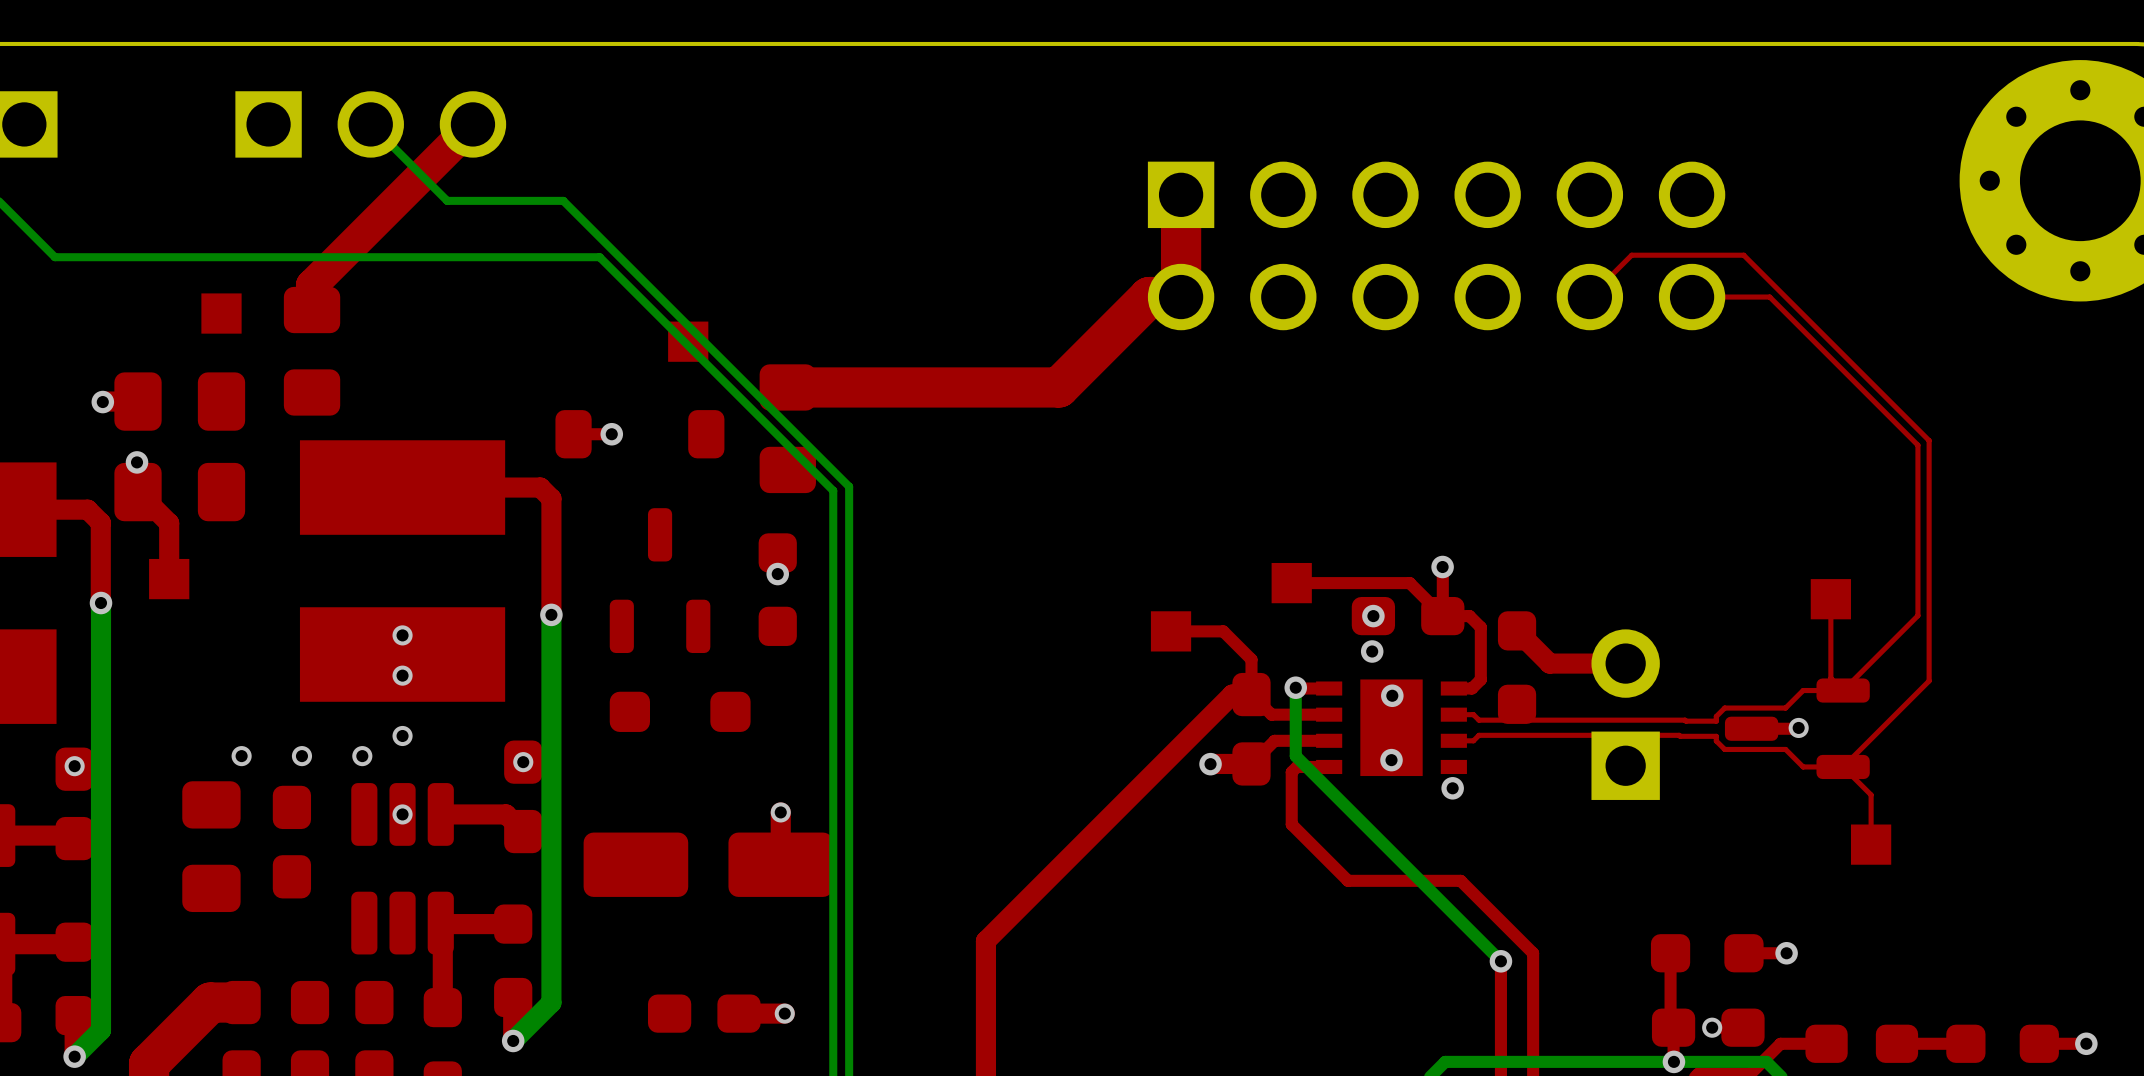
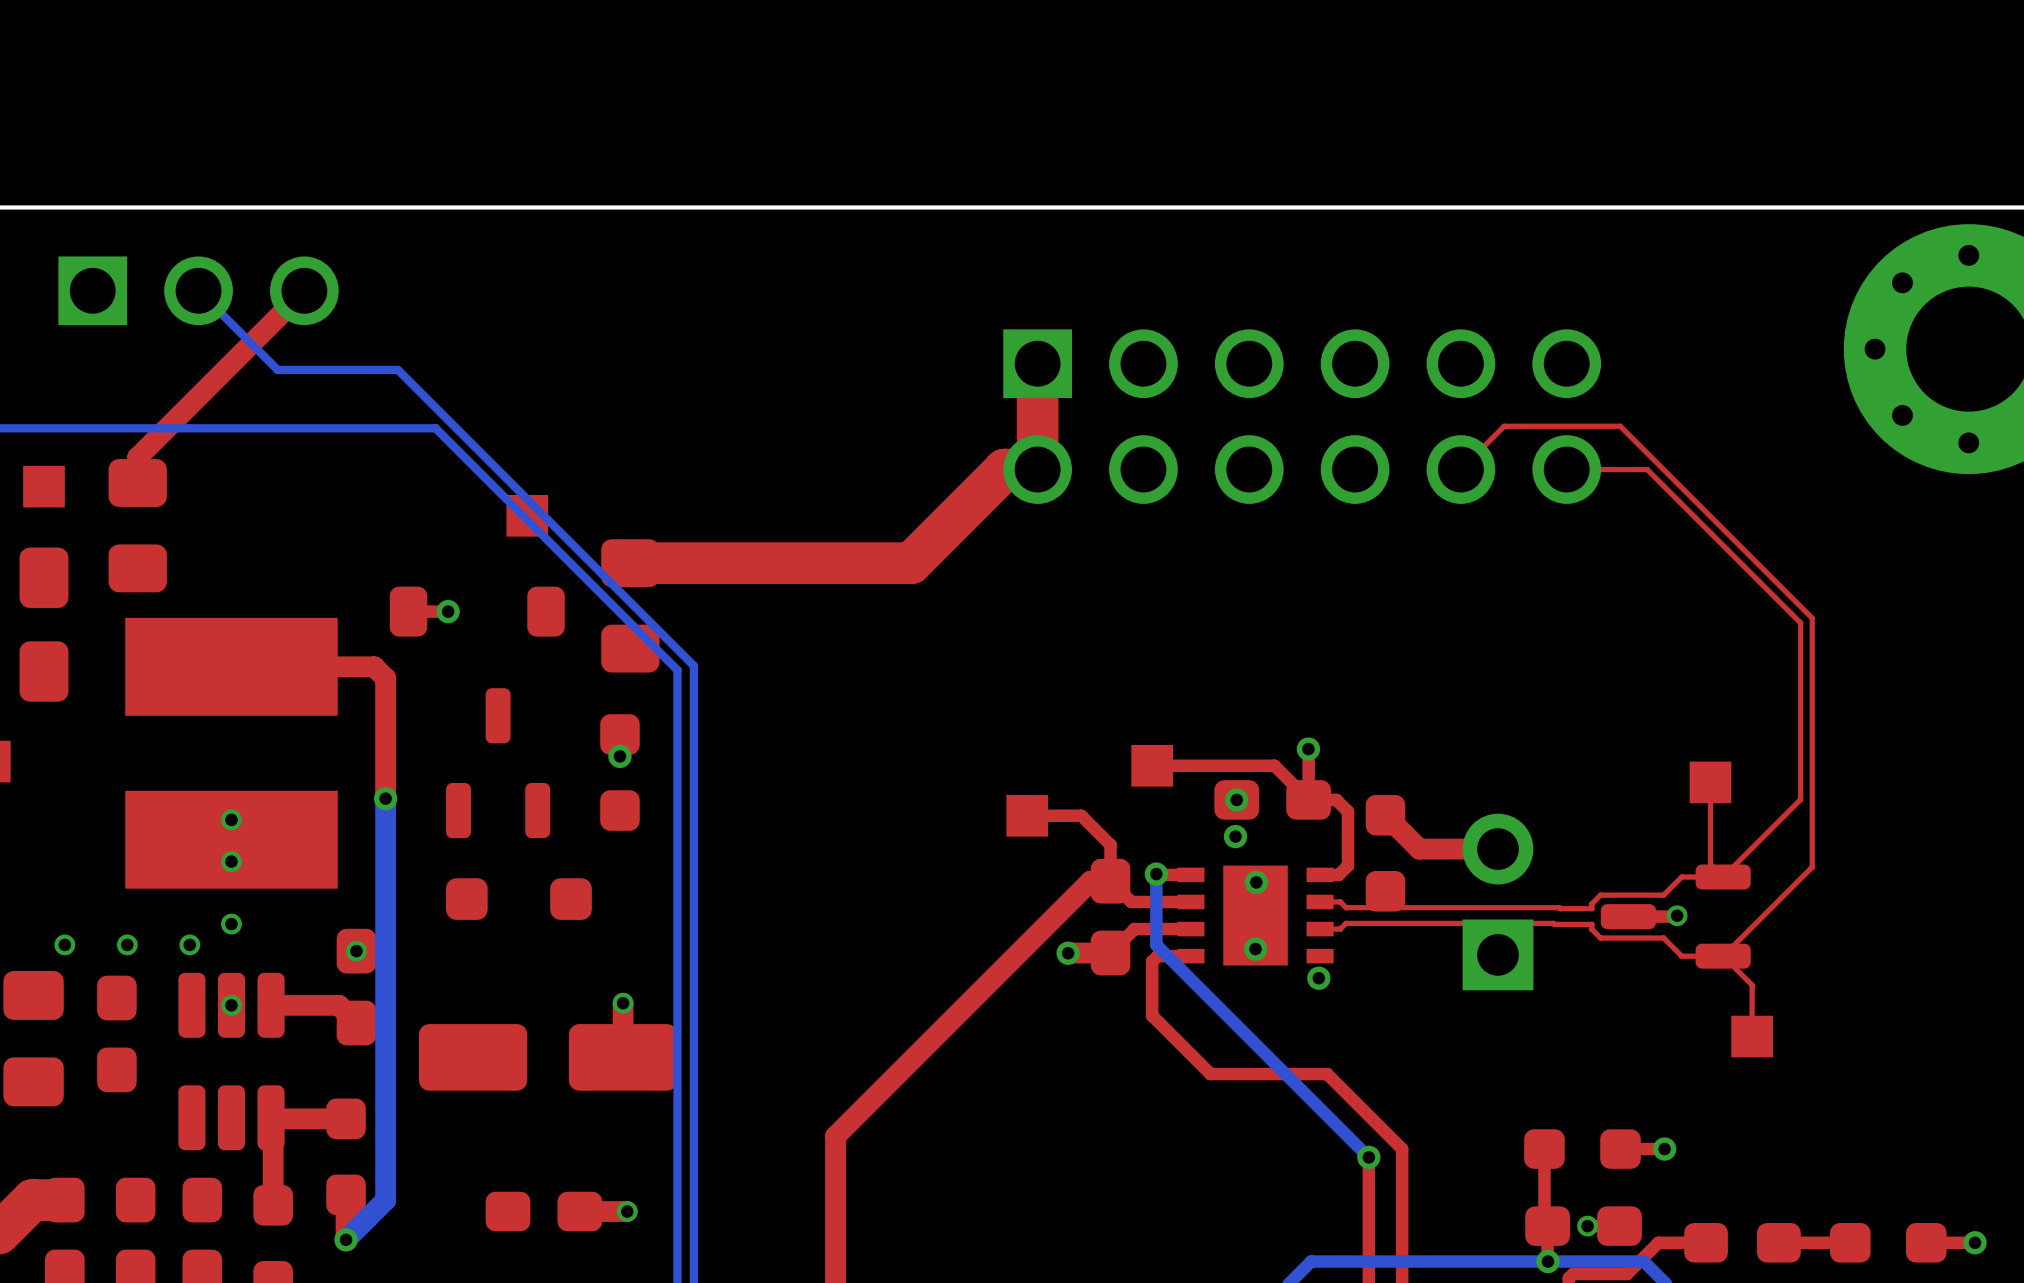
top track width: thick (472, 124) (312, 285) (312, 310) -> thin (304, 290) (137, 457) (137, 482)

